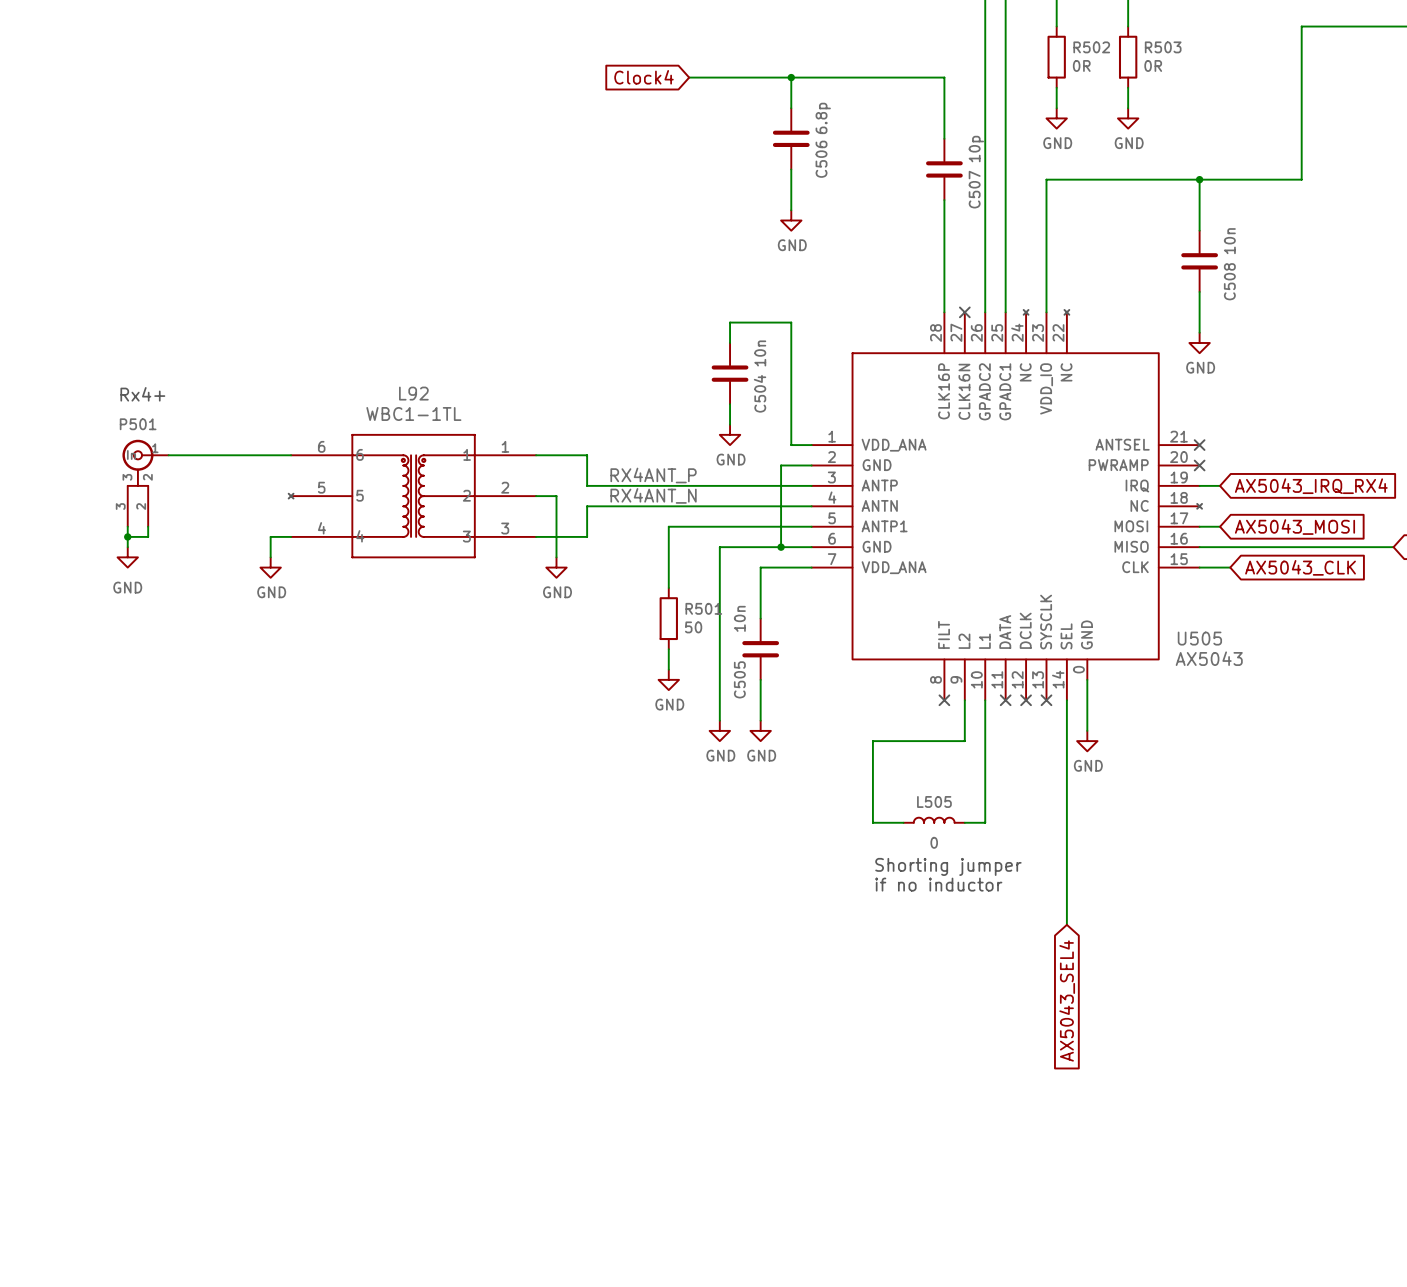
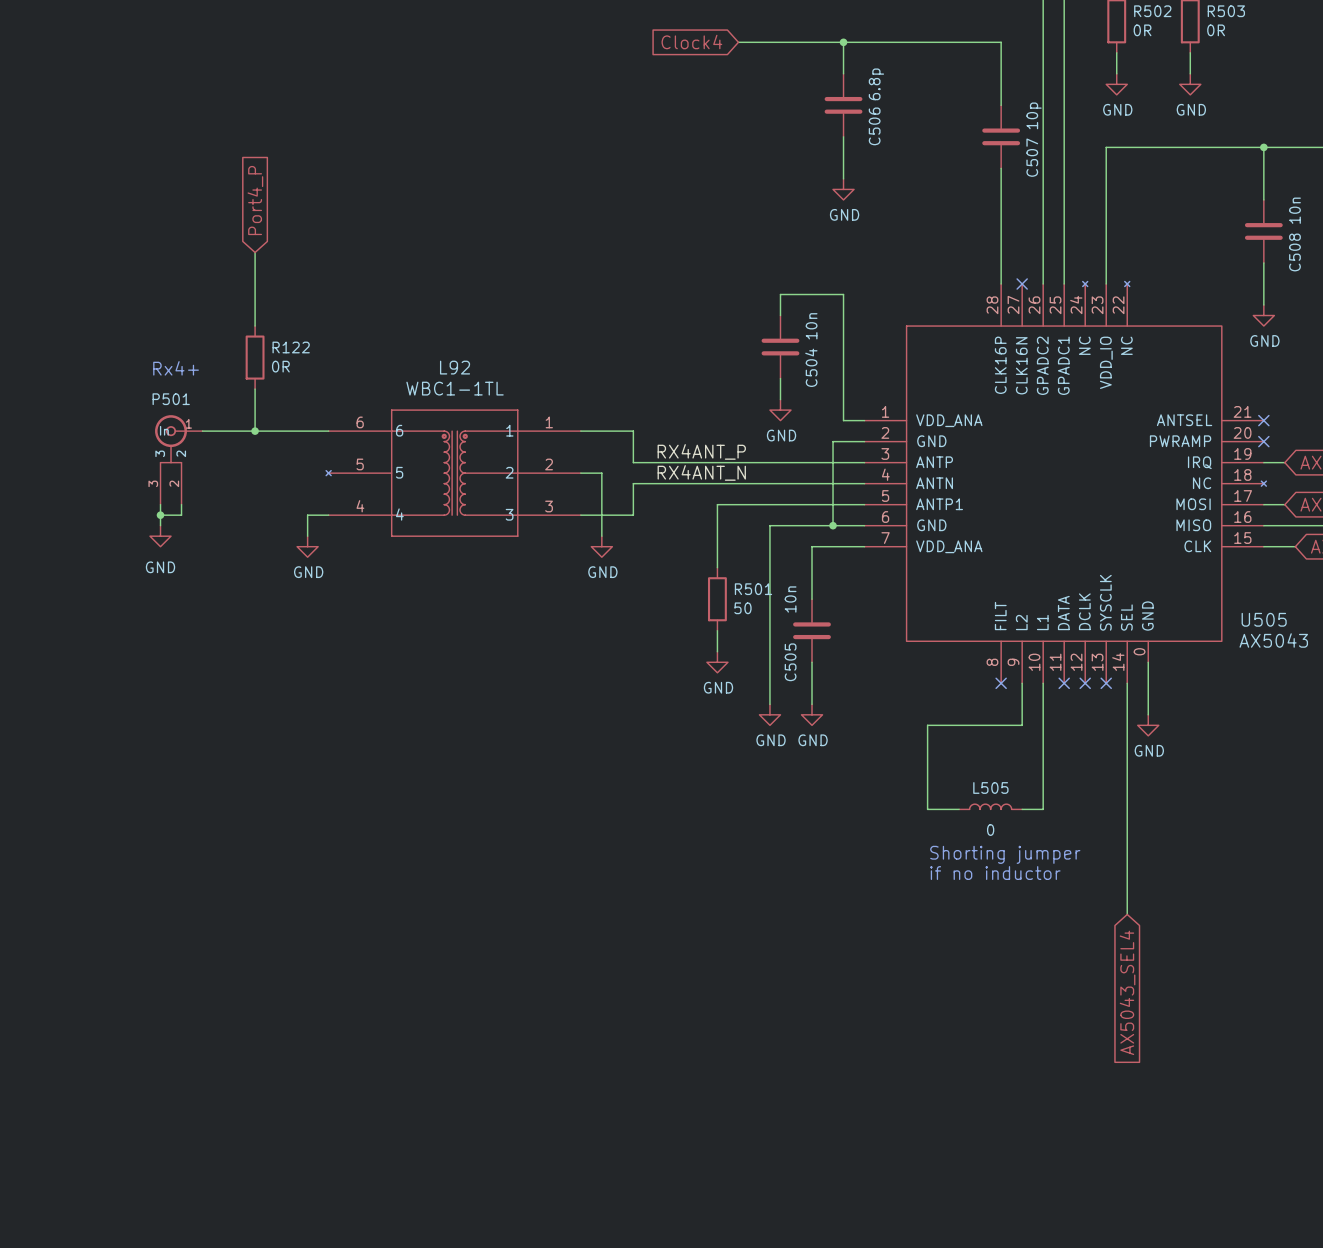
global label: none -> Port4_P (255, 200)
wire: none -> (255, 252) (255, 326)
R122: none -> 0R (255, 357)
wire: none -> (255, 389) (255, 431)
junction: none -> (255, 431)

